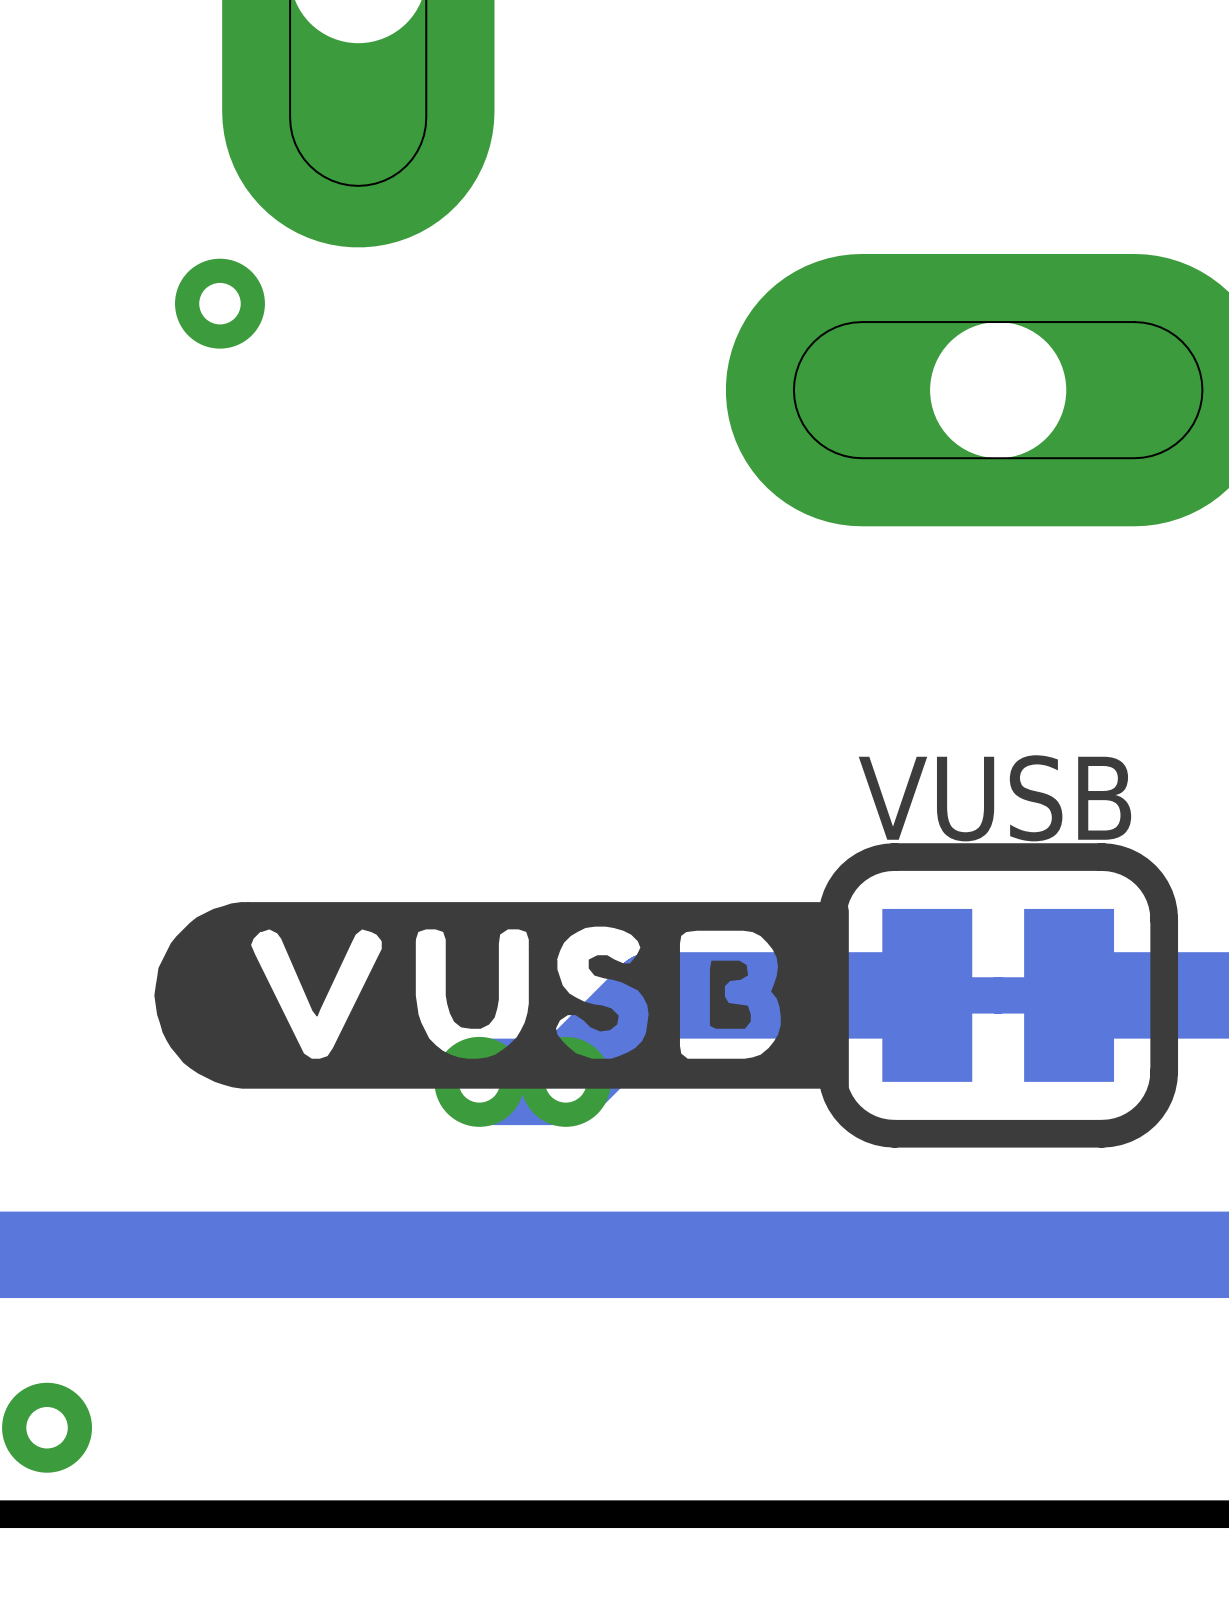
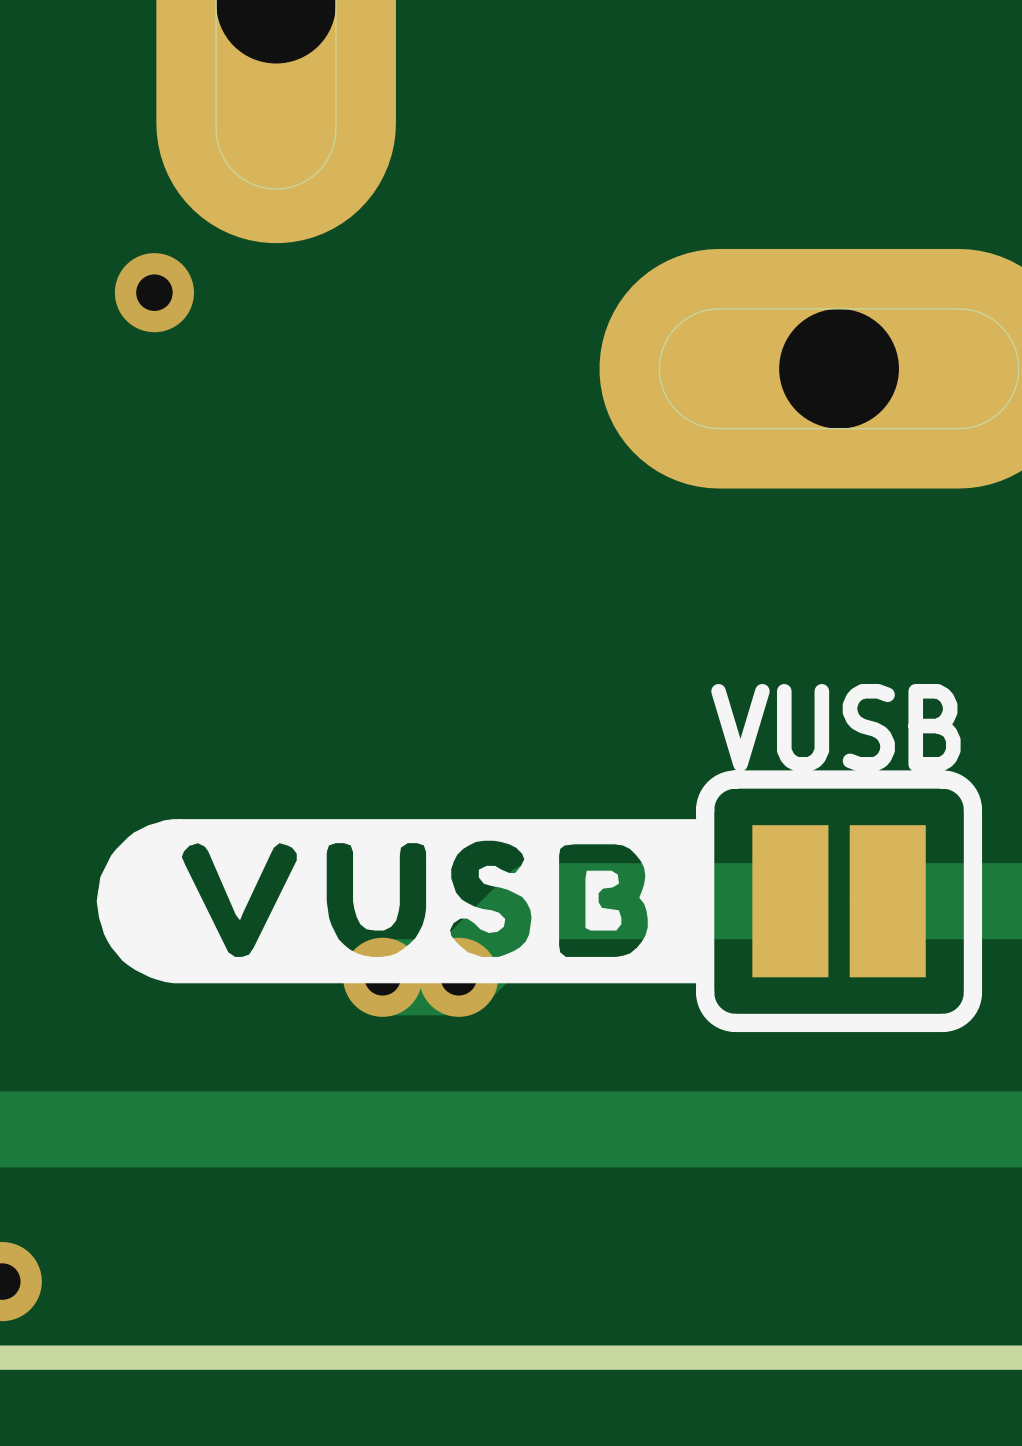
VUSB footprint: [818, 843, 1179, 1148] -> [696, 770, 983, 1033]

